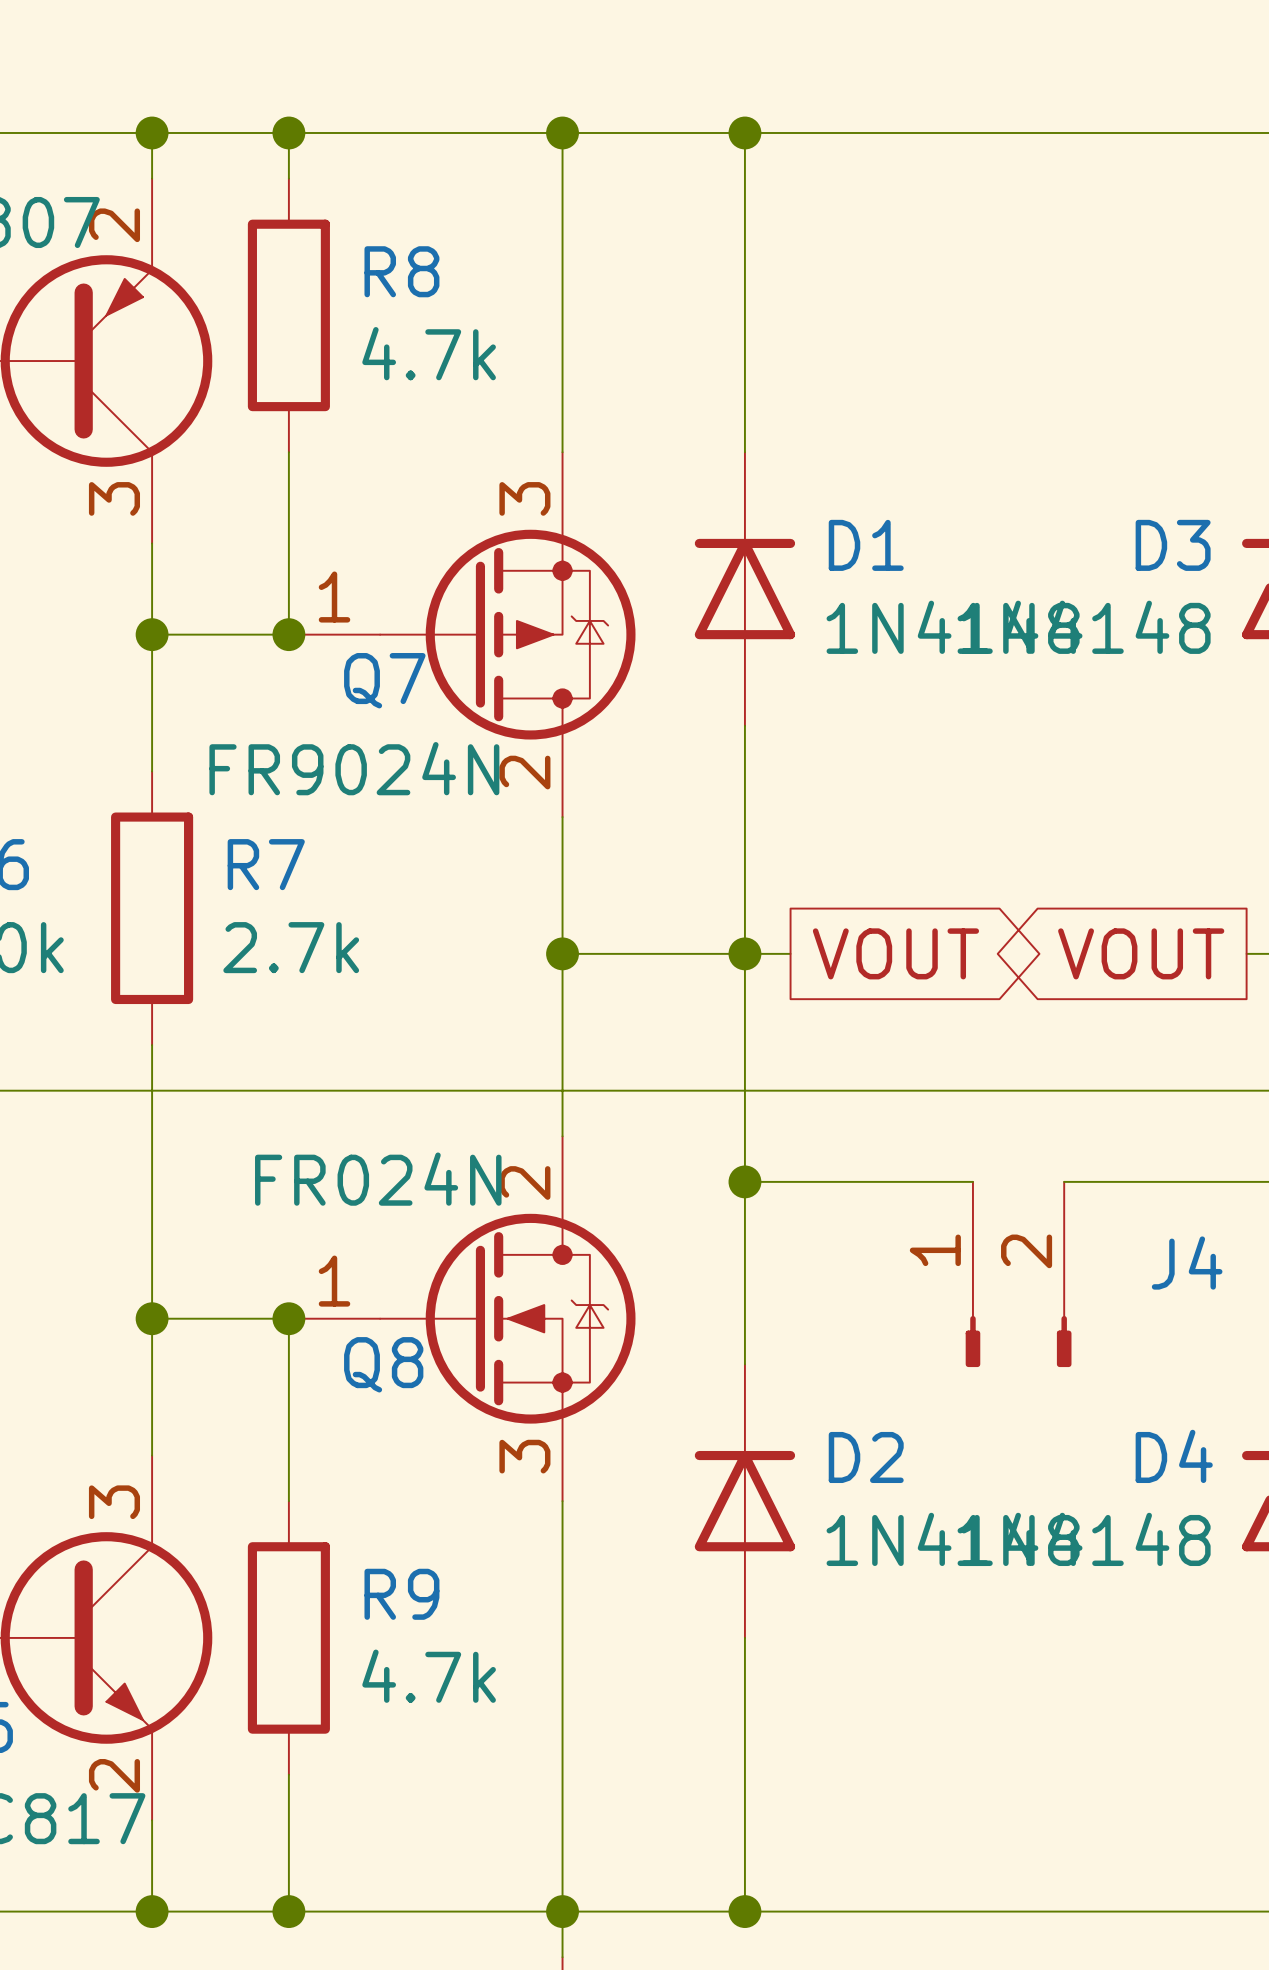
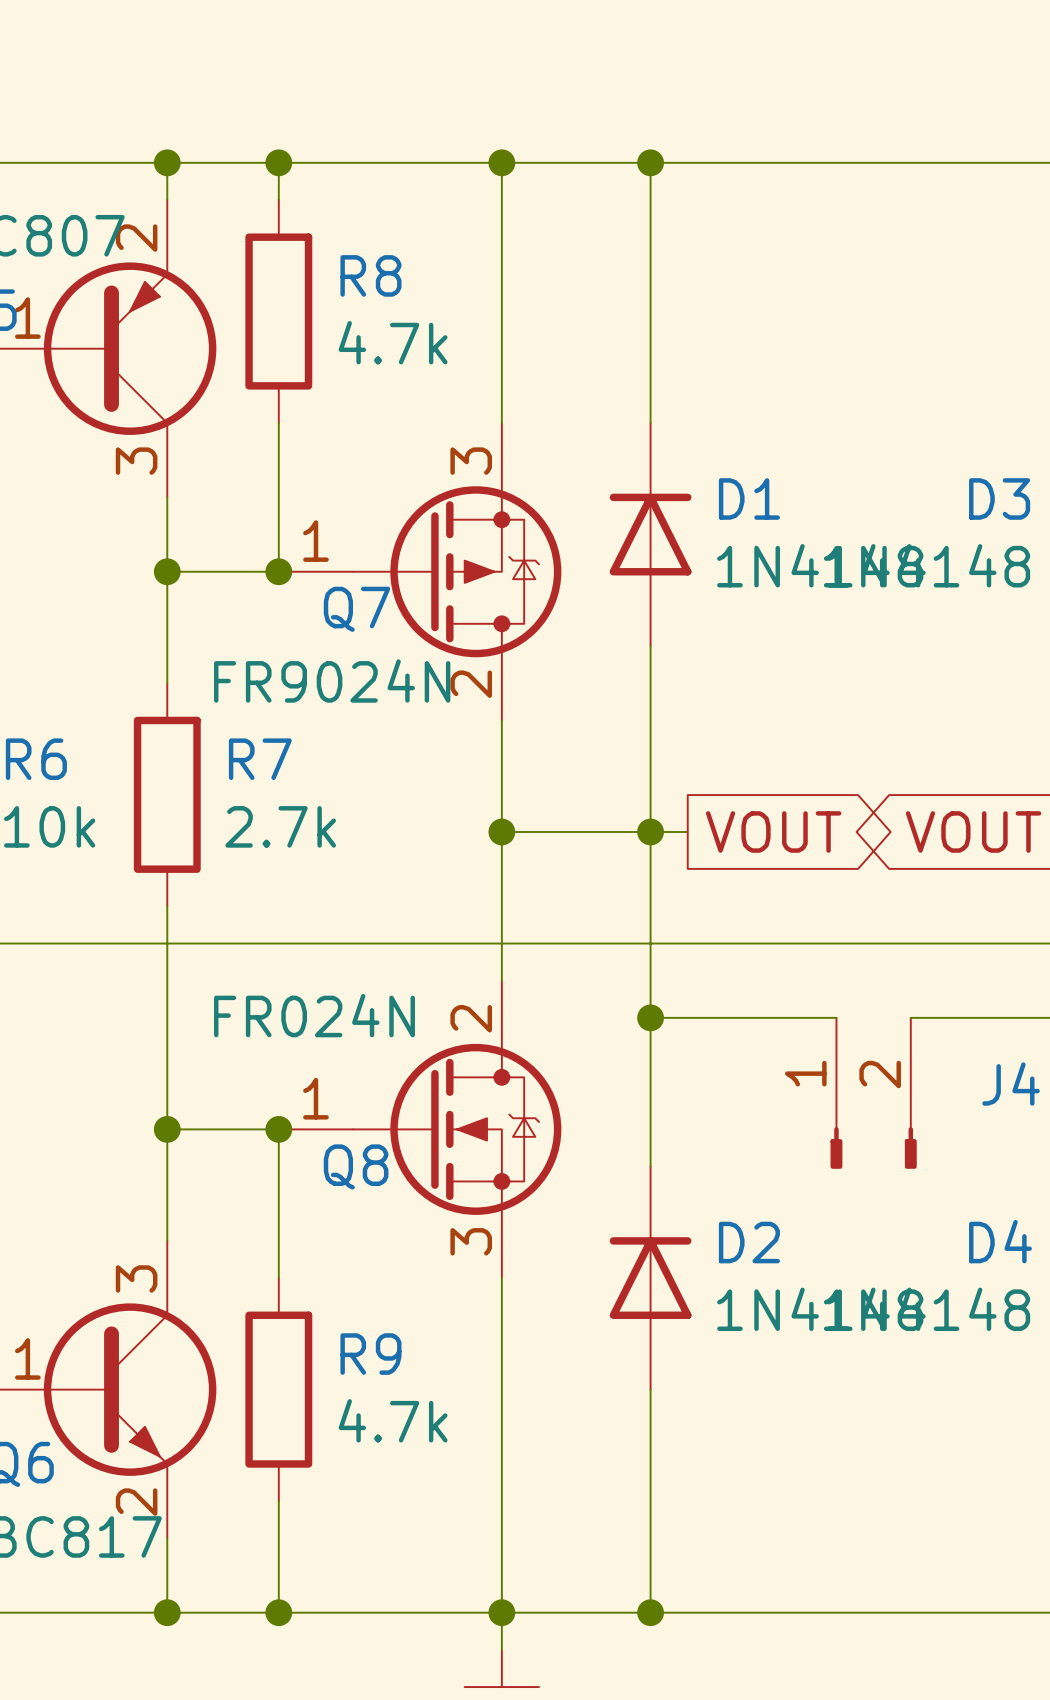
Q8 value position: FR024N (378, 1179) -> FR024N (314, 1015)

